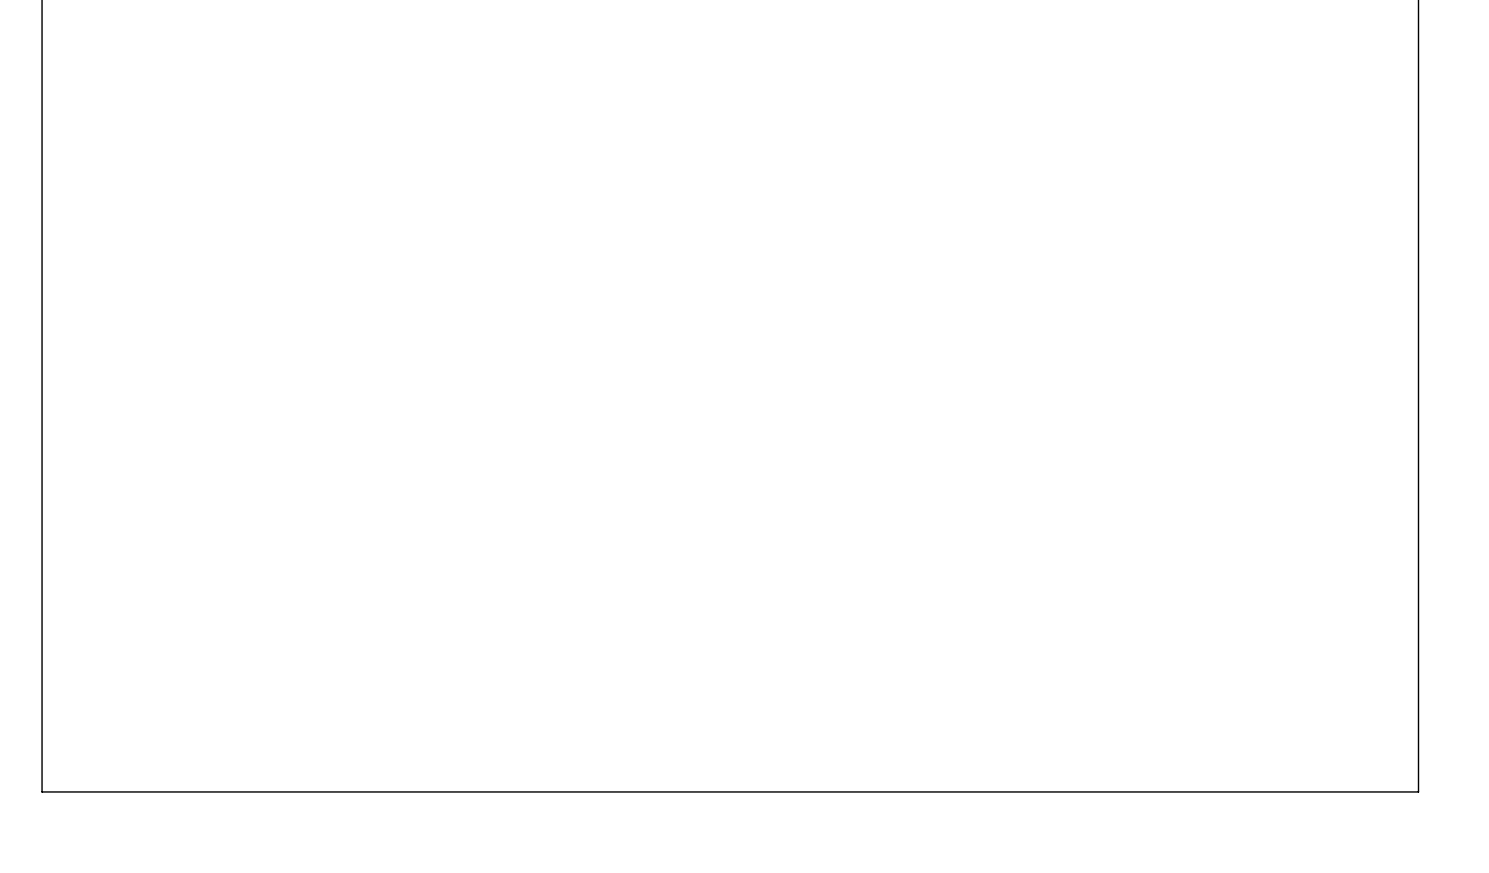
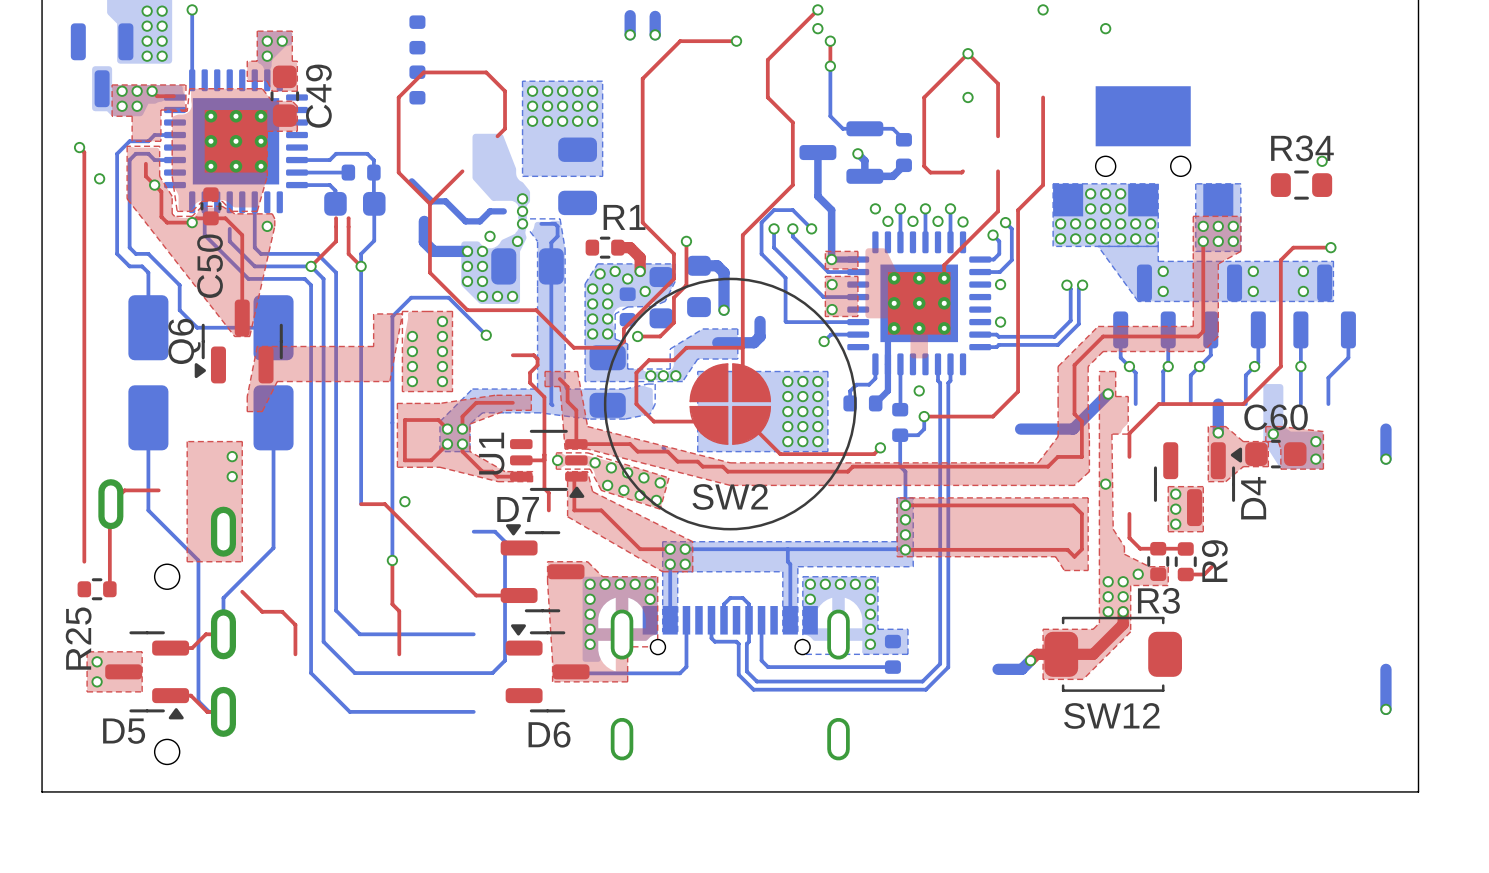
bottom track: none -> (192, 9) (192, 80)
via: none -> (192, 9)
top track: none -> (817, 9) (767, 59) (767, 97) (792, 122) (792, 185) (742, 235) (742, 381) (747, 386)
via: none -> (817, 9)
via: none -> (1043, 9)
via: none -> (147, 11)
via: none -> (162, 11)
bottom track: none -> (630, 15) (630, 34)
bottom track: none -> (655, 16) (655, 34)
via: none -> (147, 26)
via: none -> (162, 26)
via: none -> (817, 28)
via: none -> (1105, 28)
top zone outline: none -> (257, 31) (292, 31) (292, 61) (297, 61) (297, 91) (272, 91) (267, 81) (247, 81) (247, 61) (257, 61) (257, 31)
part: none -> (417, 34)
via: none -> (630, 34)
via: none -> (655, 34)
via: none -> (147, 41)
via: none -> (162, 41)
via: none -> (267, 41)
via: none -> (282, 41)
top track: none -> (736, 41) (680, 41) (642, 78) (642, 222) (673, 253) (673, 278) (623, 328) (623, 341) (617, 347) (573, 347) (536, 310) (467, 310) (429, 272) (429, 203)
via: none -> (736, 41)
top track: none -> (830, 41) (830, 66)
via: none -> (830, 41)
via: none -> (968, 53)
via: none -> (147, 56)
via: none -> (162, 56)
via: none -> (267, 56)
part: none -> (102, 65)
bottom track: none -> (830, 66) (830, 116) (842, 128) (892, 128) (903, 139)
via: none -> (830, 66)
bottom zone outline: none -> (522, 81) (602, 81) (602, 176) (522, 176) (522, 81)
top zone outline: none -> (112, 84) (112, 116) (132, 116) (132, 141) (160, 141) (160, 110) (185, 110) (185, 84) (112, 84)
part: none -> (417, 84)
top zone outline: none -> (189, 88) (262, 88) (272, 101) (292, 101) (297, 106) (297, 131) (267, 131) (267, 176) (257, 211) (232, 211) (222, 201) (202, 201) (192, 211) (177, 211) (172, 176) (172, 111) (187, 111) (189, 88)
via: none -> (122, 91)
via: none -> (137, 91)
top track: none -> (152, 91) (157, 96) (173, 96)
via: none -> (152, 91)
via: none -> (532, 91)
via: none -> (547, 91)
via: none -> (562, 91)
via: none -> (577, 91)
via: none -> (592, 91)
C49: none -> (284, 96)
via: none -> (968, 97)
top track: none -> (1043, 97) (1043, 185) (1018, 210) (1018, 391) (993, 416) (924, 416)
via: none -> (122, 106)
via: none -> (137, 106)
via: none -> (532, 106)
via: none -> (547, 106)
via: none -> (562, 106)
via: none -> (577, 106)
via: none -> (592, 106)
via: none -> (532, 121)
via: none -> (547, 121)
via: none -> (562, 121)
via: none -> (577, 121)
via: none -> (592, 121)
bottom track: none -> (174, 135) (154, 135) (148, 141) (129, 141) (117, 153) (117, 253) (129, 266) (142, 266) (148, 272) (148, 327)
top track: none -> (497, 136) (505, 128) (505, 91) (486, 72) (423, 72) (398, 97) (398, 172) (429, 203)
top track: none -> (998, 136) (998, 83) (968, 53) (924, 97) (924, 166) (930, 172) (963, 171)
part: none -> (235, 141)
top zone outline: none -> (127, 146) (159, 146) (159, 176) (172, 196) (172, 213) (174, 216) (192, 216) (202, 206) (222, 206) (234, 213) (272, 213) (274, 226) (249, 336) (234, 336) (127, 198) (127, 146)
top track: none -> (79, 147) (84, 152) (84, 561)
via: none -> (79, 147)
part: none -> (1143, 151)
bottom track: none -> (817, 152) (817, 196) (831, 210) (831, 259) (858, 259)
part: none -> (841, 152)
part: none -> (903, 152)
bottom track: none -> (857, 153) (864, 160) (864, 176) (892, 176) (903, 165)
via: none -> (857, 153)
bottom track: none -> (174, 160) (154, 160) (148, 153) (135, 153) (129, 160) (129, 247) (135, 253) (148, 253) (179, 285) (179, 310) (197, 327) (273, 327)
bottom track: none -> (296, 160) (329, 160) (336, 153) (367, 153) (373, 160) (374, 240) (361, 253) (361, 504)
via: none -> (1322, 161)
top track: none -> (145, 163) (145, 176) (161, 191) (161, 216) (167, 222) (192, 222) (196, 218) (225, 218) (242, 235) (242, 318)
top track: none -> (462, 171) (429, 203)
top track: none -> (998, 171) (998, 211) (944, 265) (944, 278)
bottom track: none -> (296, 172) (348, 172)
part: none -> (361, 172)
part: none -> (577, 176)
via: none -> (99, 178)
bottom track: none -> (411, 181) (431, 201) (445, 201) (465, 221) (480, 221) (490, 211) (503, 211)
bottom zone outline: none -> (1195, 183) (1240, 183) (1240, 251) (1195, 251) (1195, 183)
via: none -> (154, 185)
bottom track: none -> (296, 185) (329, 185) (335, 190) (335, 203)
R34: none -> (1301, 185)
via: none -> (1090, 193)
via: none -> (1105, 193)
via: none -> (1120, 193)
via: none -> (522, 198)
bottom track: none -> (204, 202) (204, 235) (248, 278) (304, 278) (311, 285) (311, 673) (349, 711) (473, 711)
bottom track: none -> (254, 202) (254, 247) (261, 253) (317, 253) (336, 272) (336, 610) (359, 634) (473, 634)
part: none -> (354, 203)
C50: none -> (210, 206)
via: none -> (875, 208)
bottom track: none -> (900, 208) (900, 242)
via: none -> (900, 208)
bottom track: none -> (925, 208) (925, 242)
via: none -> (925, 208)
bottom track: none -> (950, 208) (950, 242)
via: none -> (950, 208)
via: none -> (1090, 208)
via: none -> (1105, 208)
via: none -> (1120, 208)
via: none -> (522, 211)
top zone outline: none -> (1193, 216) (1193, 326) (1098, 326) (1058, 366) (1058, 436) (1038, 462) (730, 462) (587, 426) (577, 371) (545, 371) (545, 386) (560, 386) (565, 449) (587, 449) (730, 485) (1074, 485) (1089, 471) (1088, 366) (1103, 351) (1203, 351) (1218, 336) (1218, 263) (1240, 251) (1240, 216) (1193, 216)
bottom zone outline: none -> (530, 218) (560, 218) (565, 248) (565, 389) (625, 389) (655, 384) (655, 404) (650, 414) (625, 419) (588, 419) (540, 412) (482, 412) (469, 424) (469, 451) (439, 451) (439, 421) (472, 389) (537, 389) (537, 241) (530, 231)
bottom track: none -> (424, 221) (424, 242) (433, 251) (467, 251)
via: none -> (887, 221)
via: none -> (912, 221)
via: none -> (937, 221)
via: none -> (963, 221)
via: none -> (192, 222)
part: none -> (336, 222)
part: none -> (348, 222)
bottom track: none -> (1005, 222) (1011, 228) (1011, 260) (999, 272) (980, 272)
via: none -> (1005, 222)
via: none -> (522, 223)
bottom track: none -> (541, 223) (555, 223) (557, 226) (557, 236) (551, 242) (552, 405)
via: none -> (1060, 223)
via: none -> (1075, 223)
via: none -> (1090, 223)
via: none -> (1105, 223)
via: none -> (1120, 223)
via: none -> (1135, 223)
via: none -> (1150, 223)
via: none -> (267, 226)
via: none -> (1203, 226)
via: none -> (1218, 226)
via: none -> (1233, 226)
top track: none -> (336, 227) (336, 241) (311, 266)
top track: none -> (348, 227) (348, 253) (361, 266)
bottom track: none -> (229, 228) (229, 241) (254, 266) (311, 266) (323, 278) (323, 641) (354, 673) (492, 673) (505, 660) (505, 541) (495, 531) (473, 531)
bottom track: none -> (774, 228) (774, 247) (823, 297) (858, 297)
via: none -> (774, 228)
bottom track: none -> (792, 228) (792, 236) (828, 272) (858, 272)
via: none -> (792, 228)
bottom track: none -> (811, 228) (792, 210) (774, 210) (761, 222) (761, 253) (785, 277) (785, 321) (858, 322)
via: none -> (811, 228)
bottom track: none -> (993, 235) (999, 241) (999, 253) (993, 259) (980, 259)
via: none -> (993, 235)
via: none -> (490, 236)
via: none -> (1060, 238)
via: none -> (1075, 238)
via: none -> (1090, 238)
via: none -> (1105, 238)
via: none -> (1120, 238)
via: none -> (1135, 238)
via: none -> (1150, 238)
via: none -> (517, 241)
top track: none -> (686, 241) (686, 285) (673, 297) (673, 322) (660, 336) (637, 336)
via: none -> (686, 241)
top track: none -> (1203, 241) (1203, 331) (1198, 336) (1103, 336) (1074, 365) (1074, 414) (1081, 421) (1081, 456) (1057, 456) (1048, 466) (852, 466) (847, 471) (727, 471) (722, 466) (702, 466) (697, 461) (677, 461) (667, 451) (637, 451) (630, 444) (576, 444) (576, 410) (567, 401) (567, 386) (559, 379)
via: none -> (1203, 241)
via: none -> (1218, 241)
via: none -> (1233, 241)
bottom zone outline: none -> (1098, 246) (1138, 301) (1333, 301) (1333, 261) (1158, 261) (1158, 183) (1053, 183) (1053, 246) (1158, 246)
R1: none -> (605, 247)
top track: none -> (617, 247) (630, 247) (640, 257) (640, 271)
top track: none -> (1330, 247) (1293, 247) (1280, 260) (1280, 366) (1243, 404) (1158, 404) (1129, 433) (1129, 456)
via: none -> (1330, 247)
via: none -> (467, 251)
via: none -> (482, 251)
top zone outline: none -> (825, 251) (825, 268) (857, 268) (857, 251) (825, 251)
via: none -> (831, 259)
bottom zone outline: none -> (597, 263) (585, 283) (585, 381) (682, 381) (697, 359) (737, 359) (737, 328) (702, 328) (670, 349) (670, 369) (627, 369) (627, 344) (615, 338) (615, 313) (627, 306) (652, 306) (665, 301) (675, 281) (675, 263) (597, 263)
bottom track: none -> (698, 265) (717, 265) (724, 272) (724, 310)
via: none -> (311, 266)
via: none -> (361, 266)
via: none -> (467, 266)
via: none -> (482, 266)
part: none -> (527, 266)
via: none -> (615, 271)
via: none -> (640, 271)
via: none -> (1163, 271)
via: none -> (1253, 271)
via: none -> (1303, 271)
via: none -> (600, 273)
top zone outline: none -> (825, 276) (825, 316) (857, 316) (857, 276) (825, 276)
via: none -> (627, 278)
via: none -> (467, 281)
via: none -> (482, 281)
via: none -> (832, 284)
via: none -> (1000, 284)
bottom track: none -> (1066, 285) (1070, 288) (1070, 320) (1054, 336) (998, 336) (996, 334) (980, 334)
via: none -> (1066, 285)
bottom track: none -> (1082, 285) (1078, 288) (1078, 324) (1057, 344) (998, 344) (996, 347) (980, 347)
via: none -> (1082, 285)
part: none -> (698, 286)
via: none -> (592, 288)
via: none -> (607, 288)
via: none -> (645, 291)
via: none -> (1163, 291)
via: none -> (1253, 291)
via: none -> (1303, 291)
via: none -> (482, 296)
via: none -> (497, 296)
via: none -> (512, 296)
part: none -> (661, 297)
via: none -> (592, 303)
via: none -> (607, 303)
part: none -> (919, 303)
part: none -> (627, 306)
part: none -> (1144, 306)
part: none -> (1234, 306)
part: none -> (1324, 306)
via: none -> (832, 309)
via: none -> (724, 310)
top zone outline: none -> (402, 311) (452, 311) (452, 391) (402, 391) (402, 311)
top zone outline: none -> (373, 313) (402, 313) (389, 381) (277, 381) (262, 411) (247, 411) (247, 396) (257, 346) (373, 346) (373, 313)
via: none -> (592, 318)
via: none -> (607, 318)
via: none -> (442, 321)
bottom track: none -> (760, 321) (760, 336) (754, 342) (717, 342)
via: none -> (1000, 322)
bottom track: none -> (894, 328) (887, 334) (887, 390) (875, 403)
bottom track: none -> (1120, 329) (1120, 357) (1135, 372) (1135, 404)
bottom track: none -> (1168, 329) (1168, 366) (1163, 371) (1163, 404)
bottom track: none -> (1210, 329) (1210, 355) (1190, 375) (1190, 404)
bottom track: none -> (1258, 329) (1258, 362) (1245, 375) (1245, 404)
bottom track: none -> (1300, 329) (1300, 404)
bottom track: none -> (1348, 329) (1348, 357) (1328, 377) (1328, 404)
via: none -> (592, 333)
via: none -> (607, 333)
bottom track: none -> (858, 334) (831, 334) (824, 341)
bottom track: none -> (486, 335) (448, 297) (411, 297) (392, 316) (392, 560)
via: none -> (486, 335)
via: none -> (412, 336)
via: none -> (442, 336)
via: none -> (637, 336)
Q6: none -> (238, 341)
via: none -> (824, 341)
top track: none -> (742, 347) (686, 347) (673, 360) (648, 360) (636, 372) (636, 404) (653, 421) (712, 421)
via: none -> (412, 351)
via: none -> (442, 351)
top track: none -> (512, 355) (533, 355) (537, 359) (537, 365) (530, 372) (530, 382) (544, 397) (544, 488) (548, 492) (548, 510)
bottom track: none -> (875, 364) (875, 378) (869, 384) (856, 384) (850, 391) (850, 403)
bottom track: none -> (900, 364) (900, 409)
bottom track: none -> (937, 364) (937, 380) (940, 382) (940, 663) (922, 681) (756, 681) (746, 671) (749, 604) (742, 598) (730, 598) (724, 604) (724, 620)
bottom track: none -> (950, 364) (950, 380) (948, 382) (948, 667) (925, 689) (753, 689) (738, 674) (738, 643) (736, 641) (714, 641) (711, 638) (711, 620)
via: none -> (412, 366)
via: none -> (442, 366)
via: none -> (1129, 366)
via: none -> (1168, 366)
via: none -> (1199, 366)
via: none -> (1254, 366)
via: none -> (1300, 366)
bottom zone outline: none -> (697, 371) (827, 371) (827, 451) (697, 451) (697, 371)
top zone outline: none -> (1099, 371) (1115, 371) (1115, 396) (1128, 396) (1128, 434) (1111, 434) (1113, 529) (1124, 546) (1124, 554) (1149, 566) (1168, 566) (1168, 585) (1130, 585) (1130, 631) (1083, 679) (1043, 679) (1043, 629) (1093, 629) (1099, 623) (1099, 371)
part: none -> (148, 372)
part: none -> (273, 372)
via: none -> (650, 375)
via: none -> (663, 375)
via: none -> (675, 375)
via: none -> (412, 381)
via: none -> (442, 381)
part: none -> (607, 381)
via: none -> (787, 381)
via: none -> (802, 381)
via: none -> (817, 381)
via: none -> (919, 390)
bottom track: none -> (1108, 394) (1073, 429) (1020, 429)
via: none -> (1108, 394)
top zone outline: none -> (495, 395) (531, 395) (531, 410) (506, 410) (469, 424) (469, 451) (505, 471) (532, 471) (532, 481) (498, 481) (439, 467) (397, 467) (397, 403) (439, 403) (495, 395)
via: none -> (787, 396)
via: none -> (802, 396)
via: none -> (817, 396)
top track: none -> (512, 402) (476, 402) (462, 416) (462, 429)
part: none -> (862, 403)
SW2: none -> (730, 404)
bottom track: none -> (1218, 404) (1218, 432)
via: none -> (787, 411)
via: none -> (802, 411)
via: none -> (817, 411)
bottom track: none -> (924, 416) (924, 429) (918, 435) (900, 435) (900, 466) (905, 471) (905, 505)
via: none -> (924, 416)
bottom track: none -> (148, 417) (148, 510) (198, 560) (198, 701) (209, 711) (223, 711)
bottom track: none -> (273, 417) (273, 547) (223, 598) (223, 634)
top track: none -> (747, 421) (780, 454) (874, 454) (880, 447)
part: none -> (900, 422)
via: none -> (787, 426)
via: none -> (802, 426)
via: none -> (817, 426)
top track: none -> (447, 429) (438, 420) (404, 420) (404, 460) (431, 460) (447, 444)
via: none -> (447, 429)
via: none -> (462, 429)
bottom track: none -> (1385, 429) (1385, 459)
via: none -> (1218, 432)
via: none -> (1273, 434)
top zone outline: none -> (187, 441) (242, 441) (242, 561) (187, 561) (187, 441)
via: none -> (787, 441)
via: none -> (802, 441)
via: none -> (817, 441)
top zone outline: none -> (1265, 441) (1265, 426) (1323, 431) (1323, 469) (1280, 469) (1280, 449) (1278, 441) (1243, 441) (1225, 426) (1208, 426) (1208, 481) (1225, 481) (1243, 466) (1268, 466) (1268, 441)
via: none -> (1315, 441)
via: none -> (447, 444)
top track: none -> (462, 444) (462, 451) (482, 471) (492, 471) (497, 476) (521, 476)
via: none -> (462, 444)
bottom track: none -> (663, 447) (664, 449)
via: none -> (880, 447)
top zone outline: none -> (556, 452) (556, 469) (590, 469) (601, 490) (660, 509) (668, 477) (587, 452) (556, 452)
C60: none -> (1275, 454)
via: none -> (232, 456)
via: none -> (1315, 459)
via: none -> (1385, 459)
top track: none -> (521, 460) (544, 460)
via: none -> (557, 460)
via: none -> (595, 462)
U1: none -> (548, 463)
via: none -> (611, 467)
top zone outline: none -> (567, 471) (567, 516) (662, 571) (692, 571) (692, 541) (592, 491) (587, 471) (567, 471)
via: none -> (627, 472)
via: none -> (232, 476)
top track: none -> (576, 476) (574, 478) (574, 510) (601, 510) (640, 549) (670, 549)
via: none -> (643, 477)
via: none -> (660, 482)
via: none -> (1105, 484)
D4: none -> (1198, 484)
via: none -> (607, 485)
top zone outline: none -> (1168, 486) (1168, 531) (1203, 531) (1203, 486) (1168, 486)
top track: none -> (158, 490) (124, 490) (109, 505) (109, 589)
via: none -> (623, 490)
via: none -> (1175, 494)
via: none -> (640, 495)
top zone outline: none -> (897, 497) (1088, 497) (1088, 570) (1064, 570) (1055, 556) (897, 556) (897, 497)
bottom zone outline: none -> (897, 497) (913, 497) (913, 566) (797, 566) (797, 631) (782, 631) (782, 571) (677, 571) (677, 631) (662, 631) (662, 541) (897, 541) (897, 497)
via: none -> (656, 500)
via: none -> (404, 501)
top track: none -> (361, 504) (384, 504) (476, 595) (519, 595)
top track: none -> (905, 505) (1073, 505) (1081, 513) (1081, 549) (1074, 556) (1067, 549) (905, 549)
via: none -> (905, 505)
via: none -> (1175, 509)
top track: none -> (1129, 513) (1129, 537) (1140, 548) (1185, 548)
via: none -> (905, 519)
via: none -> (1175, 524)
via: none -> (905, 534)
via: none -> (670, 549)
bottom track: none -> (685, 549) (905, 549)
via: none -> (685, 549)
bottom track: none -> (787, 549) (787, 561) (790, 564) (790, 620)
via: none -> (905, 549)
top track: none -> (392, 560) (392, 604) (399, 611) (399, 654)
via: none -> (392, 560)
top zone outline: none -> (547, 561) (587, 561) (602, 576) (657, 576) (657, 646) (627, 646) (627, 681) (552, 681) (547, 561)
R3: none -> (1158, 561)
R9: none -> (1185, 561)
bottom track: none -> (670, 564) (670, 620)
via: none -> (670, 564)
via: none -> (685, 564)
top track: none -> (1212, 566) (1204, 574) (1185, 574)
D7: none -> (542, 568)
via: none -> (1138, 574)
bottom zone outline: none -> (802, 576) (877, 576) (877, 629) (907, 629) (907, 654) (802, 654) (802, 576)
via: none -> (1108, 581)
via: none -> (1123, 581)
via: none -> (590, 584)
via: none -> (605, 584)
via: none -> (620, 584)
via: none -> (635, 584)
via: none -> (650, 584)
via: none -> (810, 584)
via: none -> (825, 584)
via: none -> (840, 584)
via: none -> (855, 584)
via: none -> (870, 584)
R25: none -> (97, 589)
top track: none -> (242, 591) (262, 611) (282, 611) (295, 624) (295, 654)
via: none -> (1108, 596)
via: none -> (1123, 596)
via: none -> (590, 599)
via: none -> (650, 599)
via: none -> (810, 599)
via: none -> (870, 599)
via: none -> (1108, 611)
top track: none -> (1123, 611) (1123, 624) (1093, 654) (1036, 654) (1030, 660)
via: none -> (1123, 611)
via: none -> (590, 614)
via: none -> (870, 614)
bottom track: none -> (686, 620) (686, 666) (679, 673) (567, 673)
bottom track: none -> (761, 620) (761, 660) (768, 667) (892, 667)
part: none -> (167, 621)
via: none -> (590, 629)
via: none -> (870, 629)
top track: none -> (223, 634) (205, 634) (192, 648) (170, 648)
via: none -> (590, 644)
via: none -> (870, 644)
top zone outline: none -> (87, 651) (142, 651) (142, 691) (87, 691) (87, 651)
part: none -> (892, 654)
SW12: none -> (1113, 654)
bottom track: none -> (1030, 660) (1021, 669) (998, 669)
via: none -> (1030, 660)
via: none -> (97, 661)
D6: none -> (547, 668)
bottom track: none -> (1385, 669) (1385, 709)
D5: none -> (147, 675)
via: none -> (97, 681)
part: none -> (730, 683)
top track: none -> (170, 695) (190, 695) (207, 711) (223, 711)
via: none -> (1385, 709)

